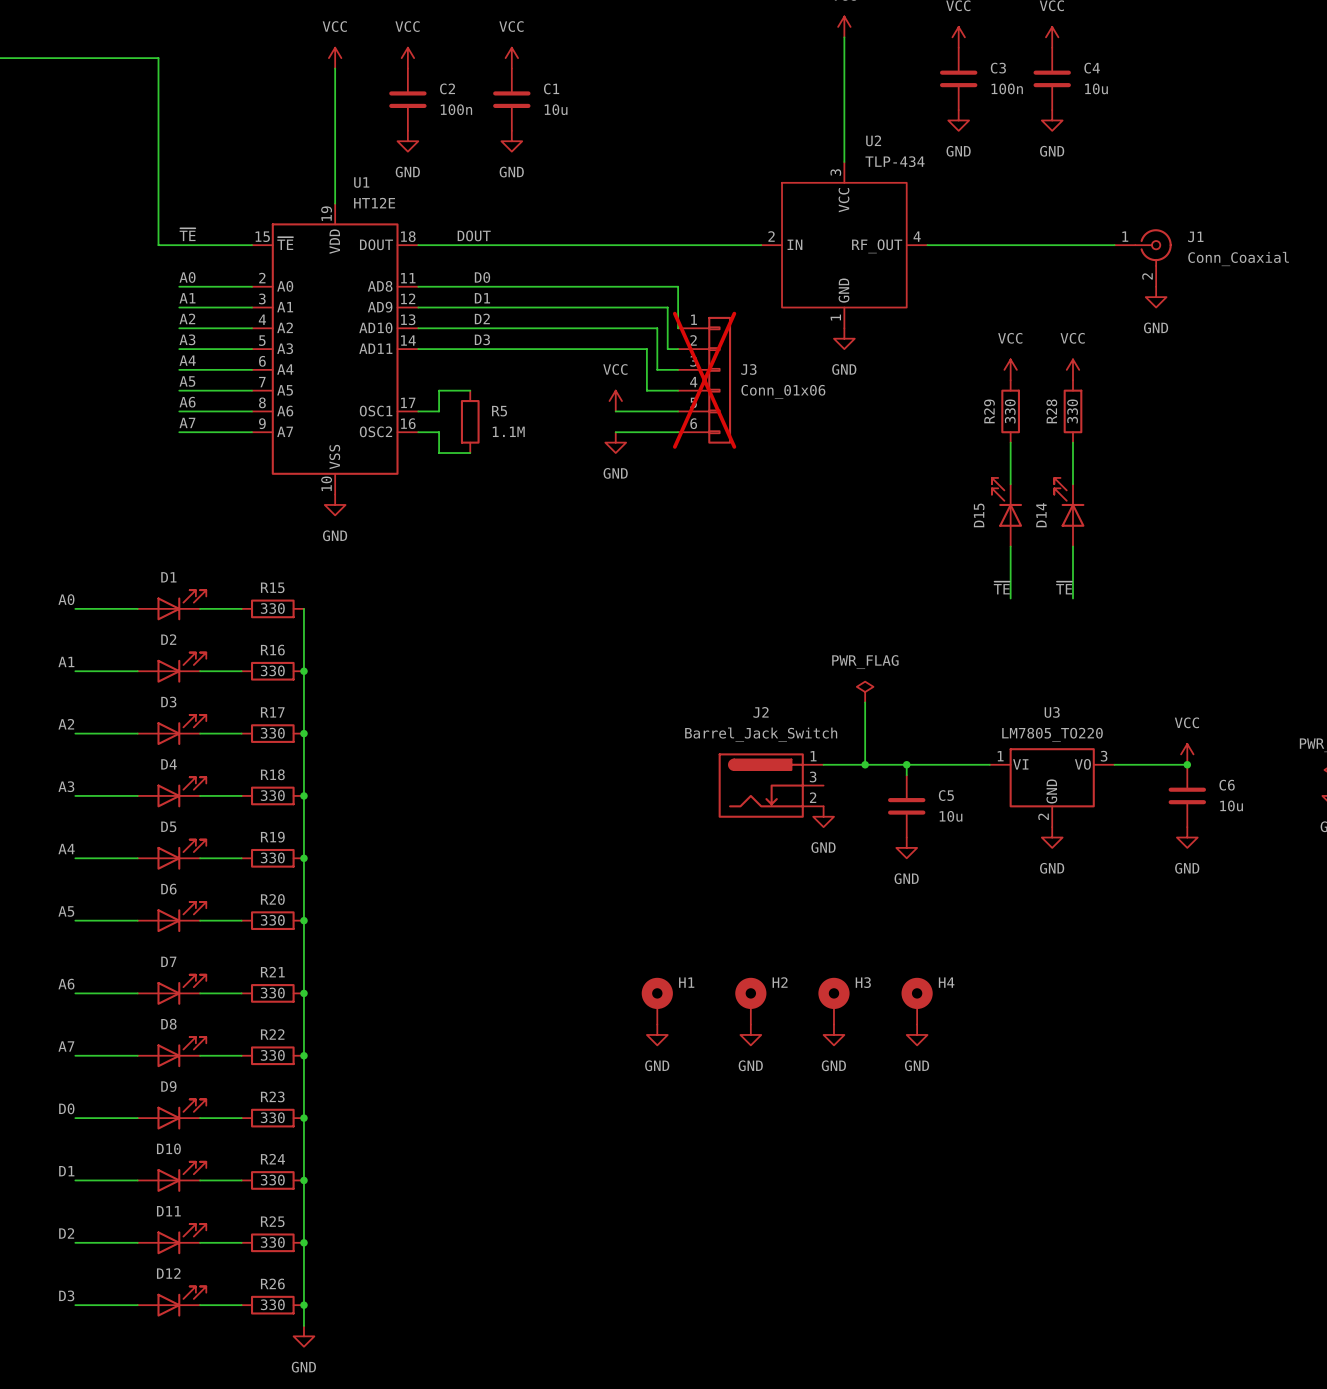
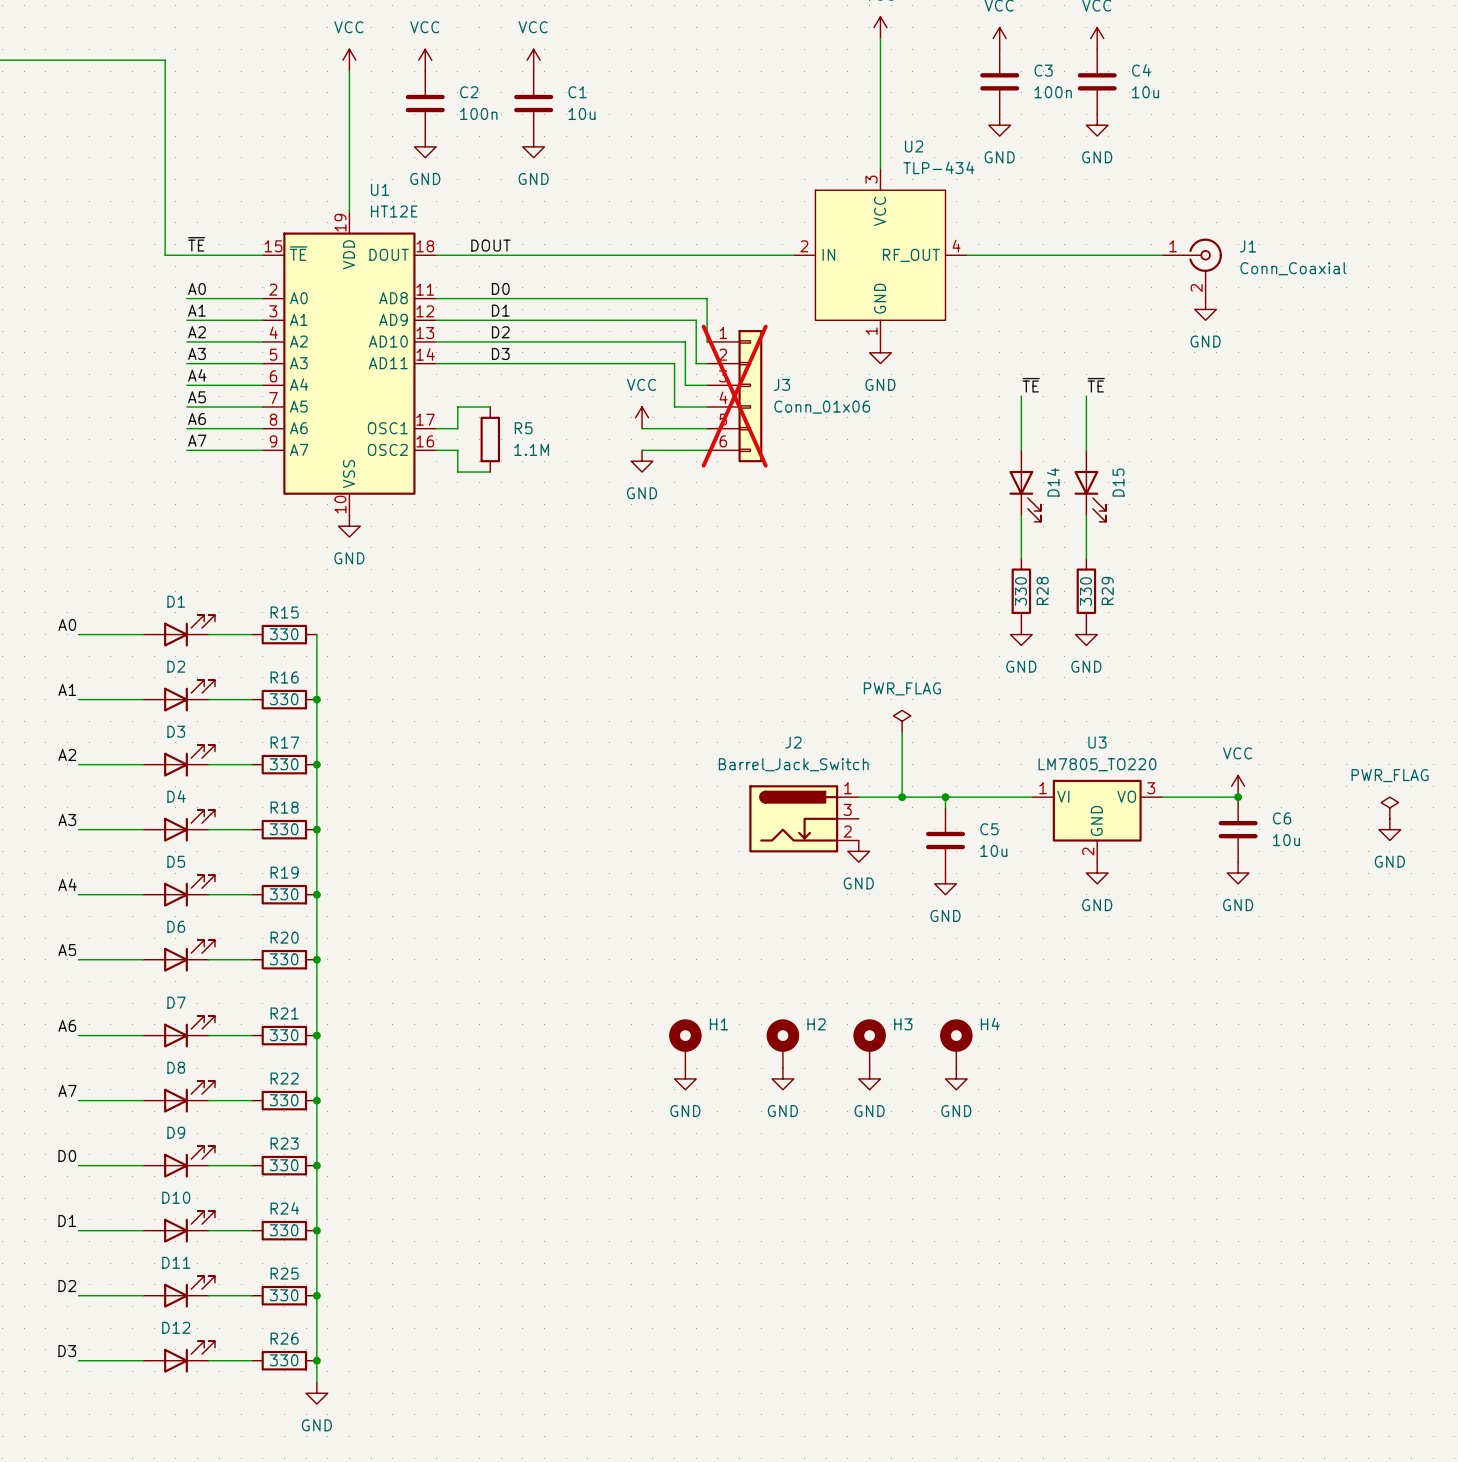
label: none -> ~{TE} (1031, 385)
power symbol: VCC (1010, 369) -> none
label: none -> ~{TE} (1096, 385)
power symbol: VCC (1072, 369) -> none
R29 name position: R29 (989, 411) -> R29 (1107, 590)
R29 position: (1010, 411) -> (1086, 591)
R28 name position: R28 (1051, 411) -> R28 (1042, 590)
R28 position: (1072, 411) -> (1021, 591)
wire: (1010, 442) (1010, 484) -> (1021, 515) (1021, 558)
wire: (1072, 442) (1072, 484) -> (1086, 515) (1086, 558)
D15 rotation: 0° (1007, 502) -> 180° (1090, 496)
D14 rotation: 0° (1069, 502) -> 180° (1025, 496)
D15 position: (1007, 512) -> (1090, 486)
D14 position: (1069, 512) -> (1025, 486)
wire: (1010, 546) (1010, 598) -> (1021, 396) (1021, 450)
wire: (1072, 546) (1072, 598) -> (1086, 396) (1086, 450)
label: ~{TE} (1001, 588) -> none
label: ~{TE} (1064, 588) -> none
power symbol: none -> GND (1021, 634)
power symbol: none -> GND (1086, 634)

